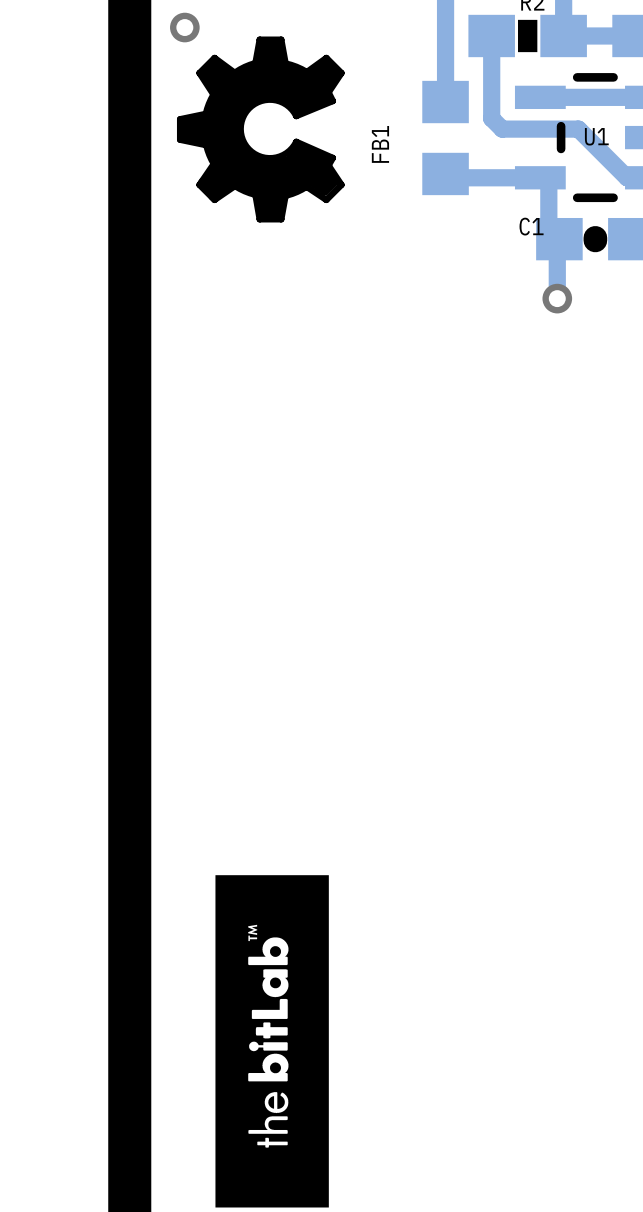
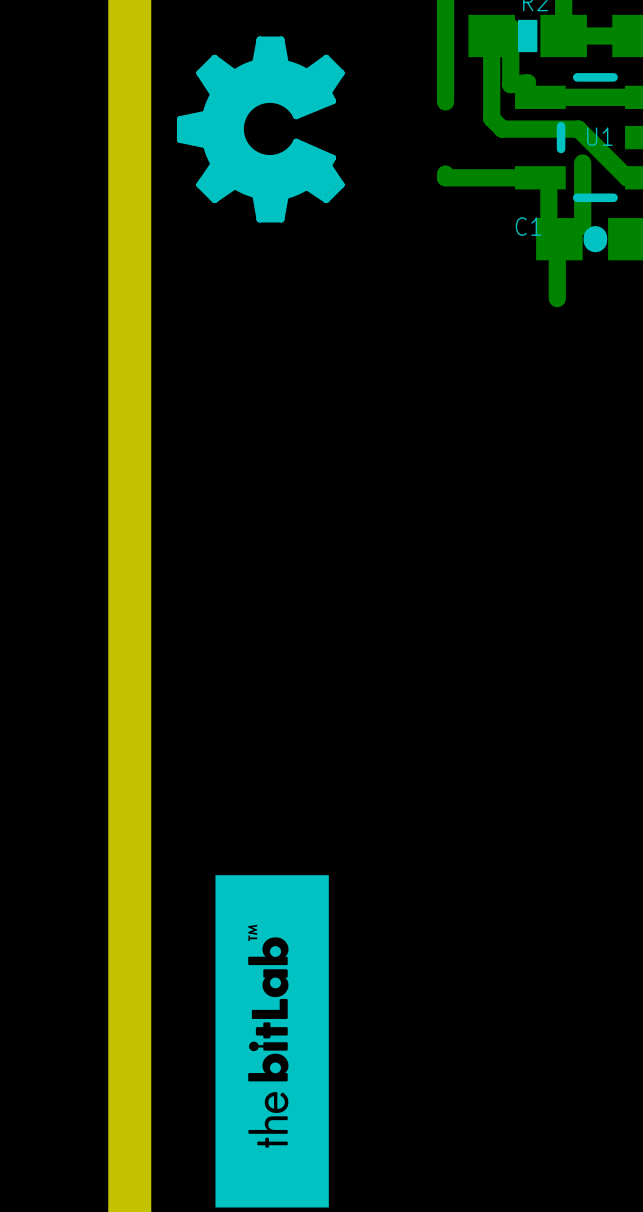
via: (184, 27) -> none
track: none -> (495, 27) (510, 27) (510, 84) (527, 82)
FB1: (445, 137) -> none
track: none -> (582, 162) (582, 226)
via: (557, 298) -> none

